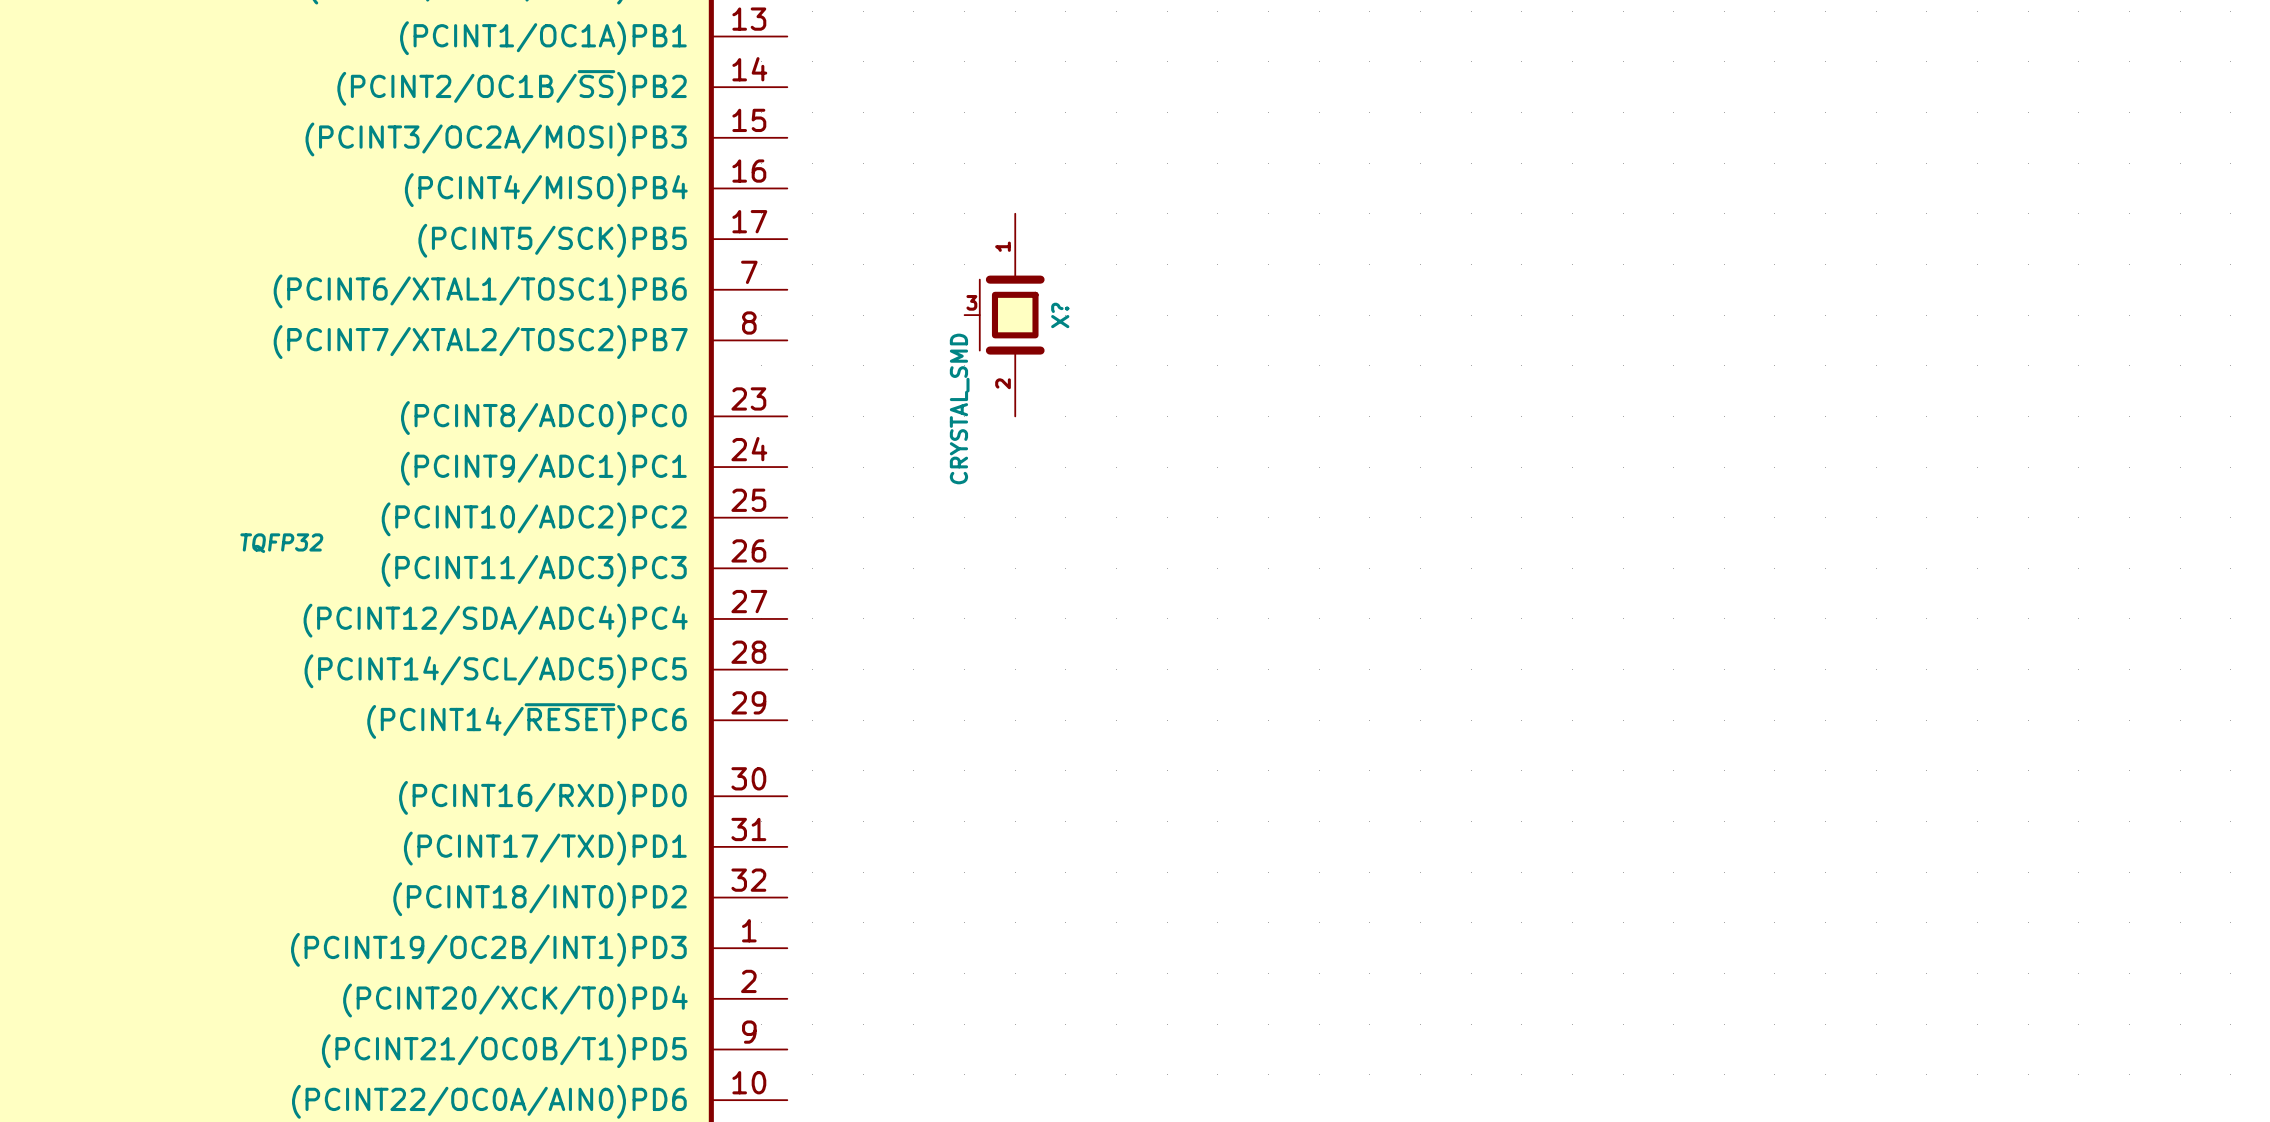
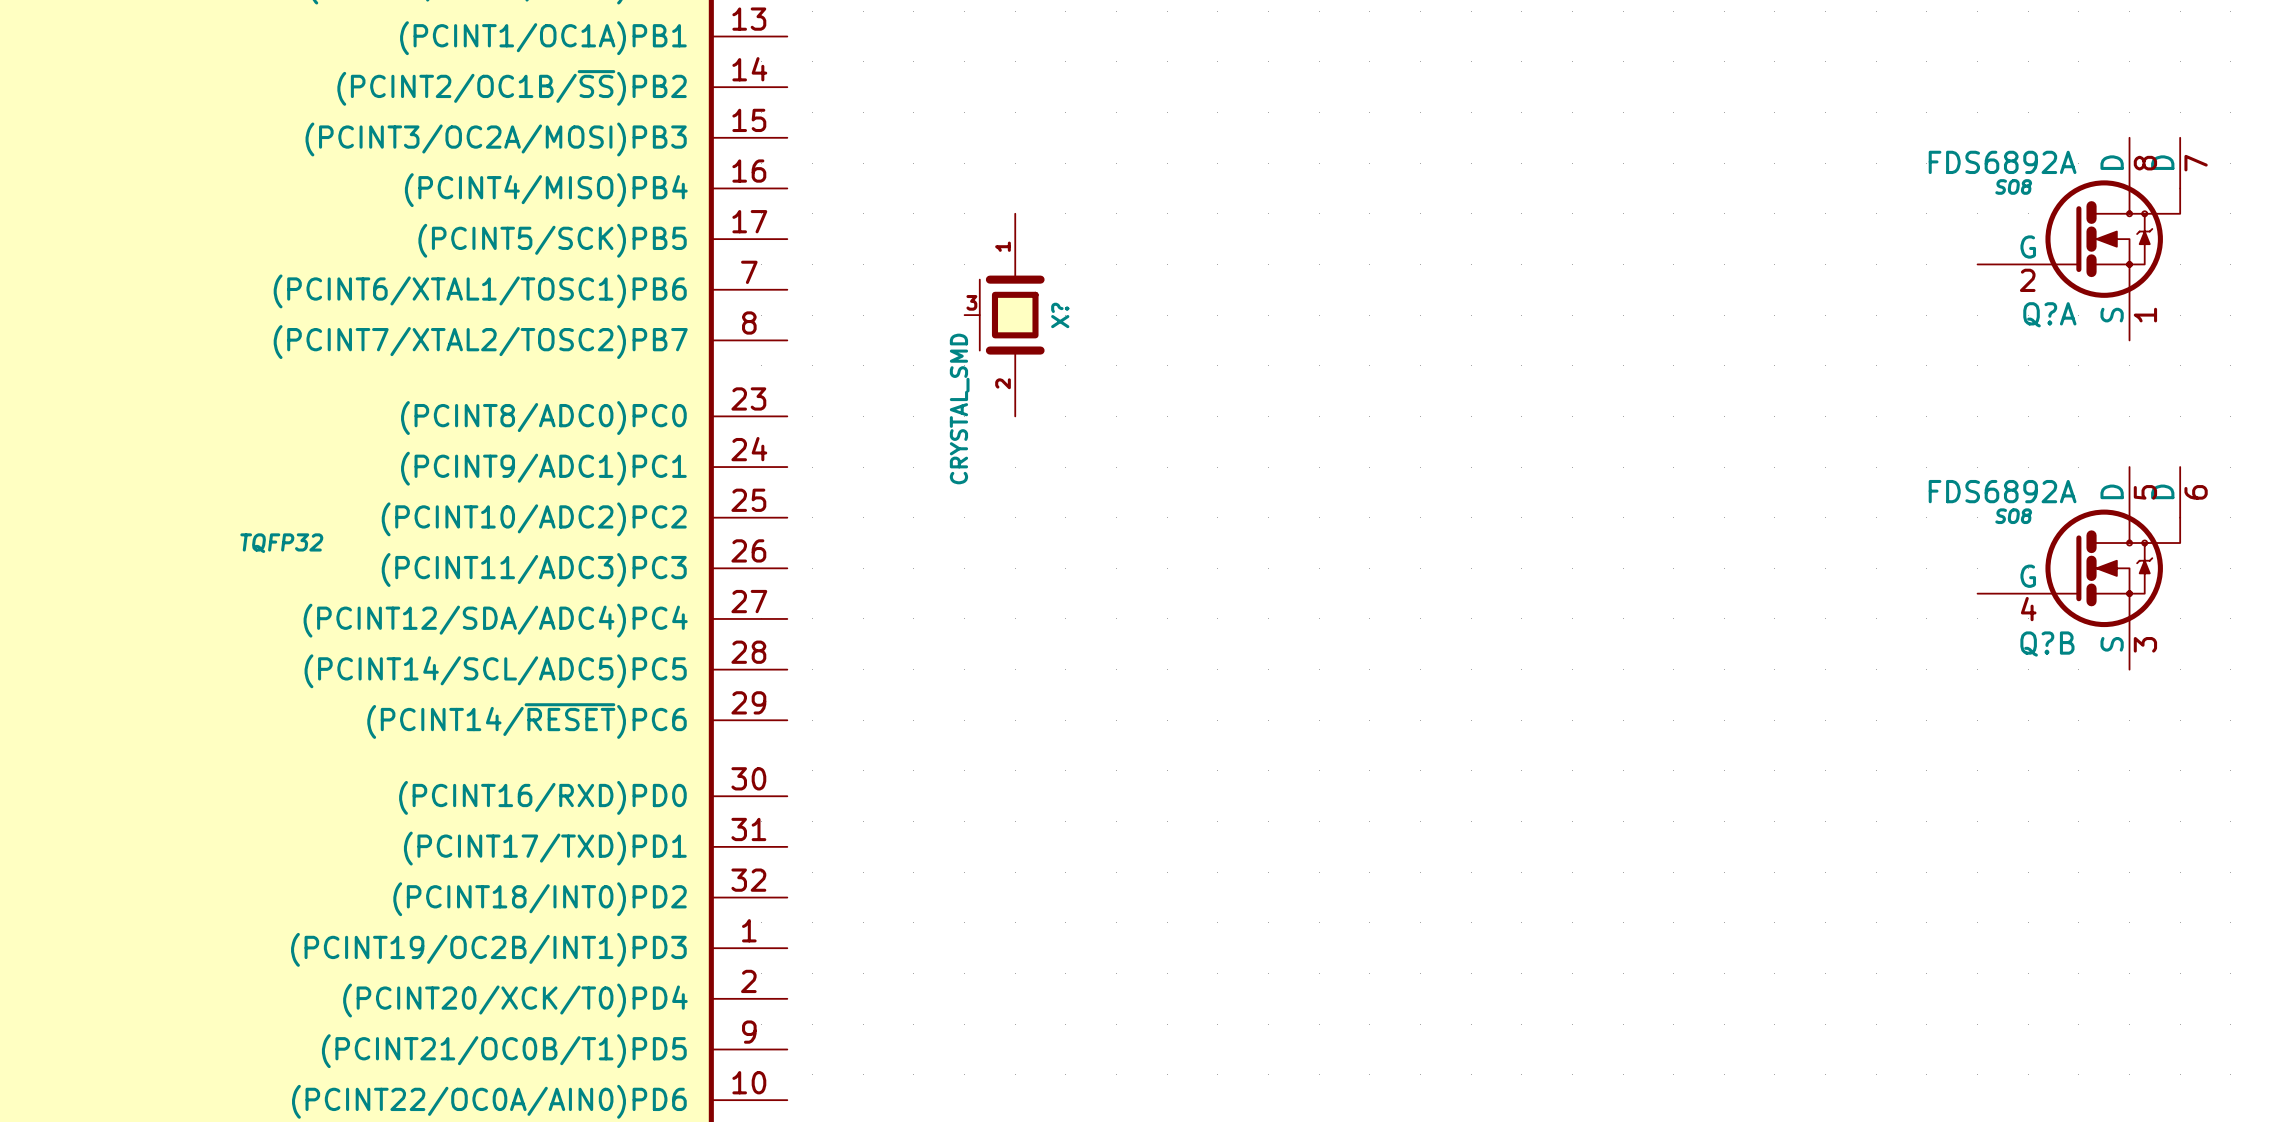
Q?A: none -> FDS6892A (2078, 239)
Q?B: none -> FDS6892A (2078, 568)

